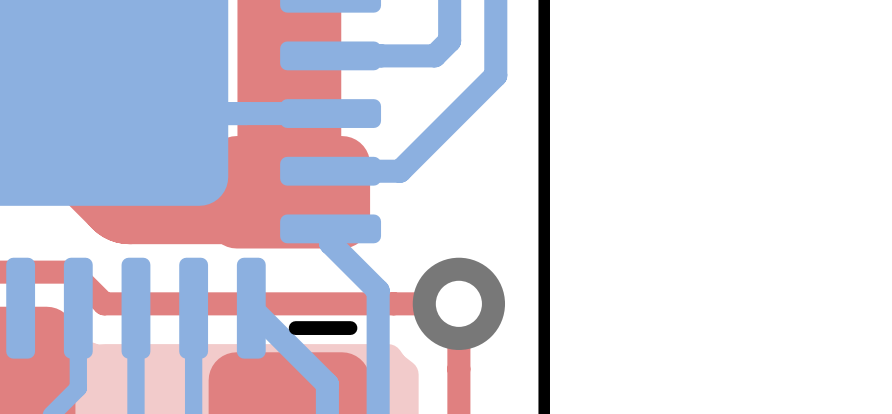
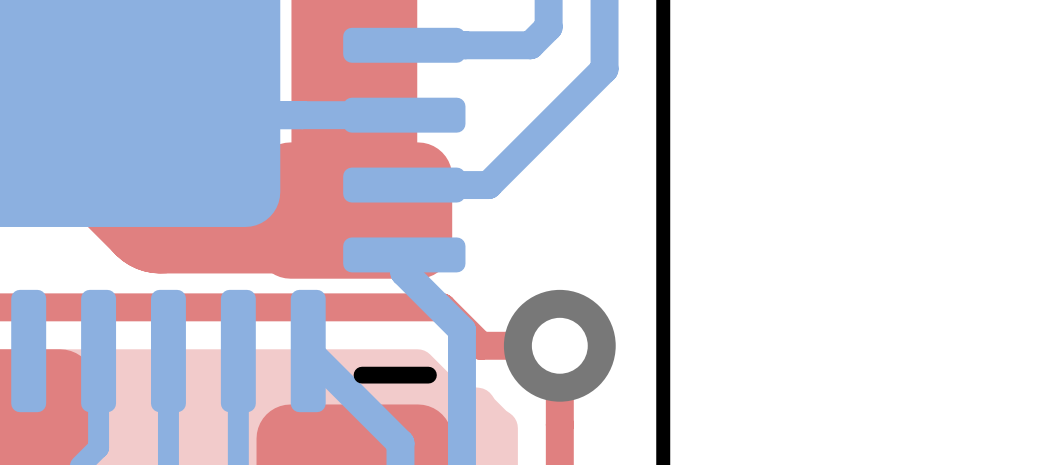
top track: (72, 272) (104, 303) (393, 303) -> (91, 307) (442, 307) (480, 345)

